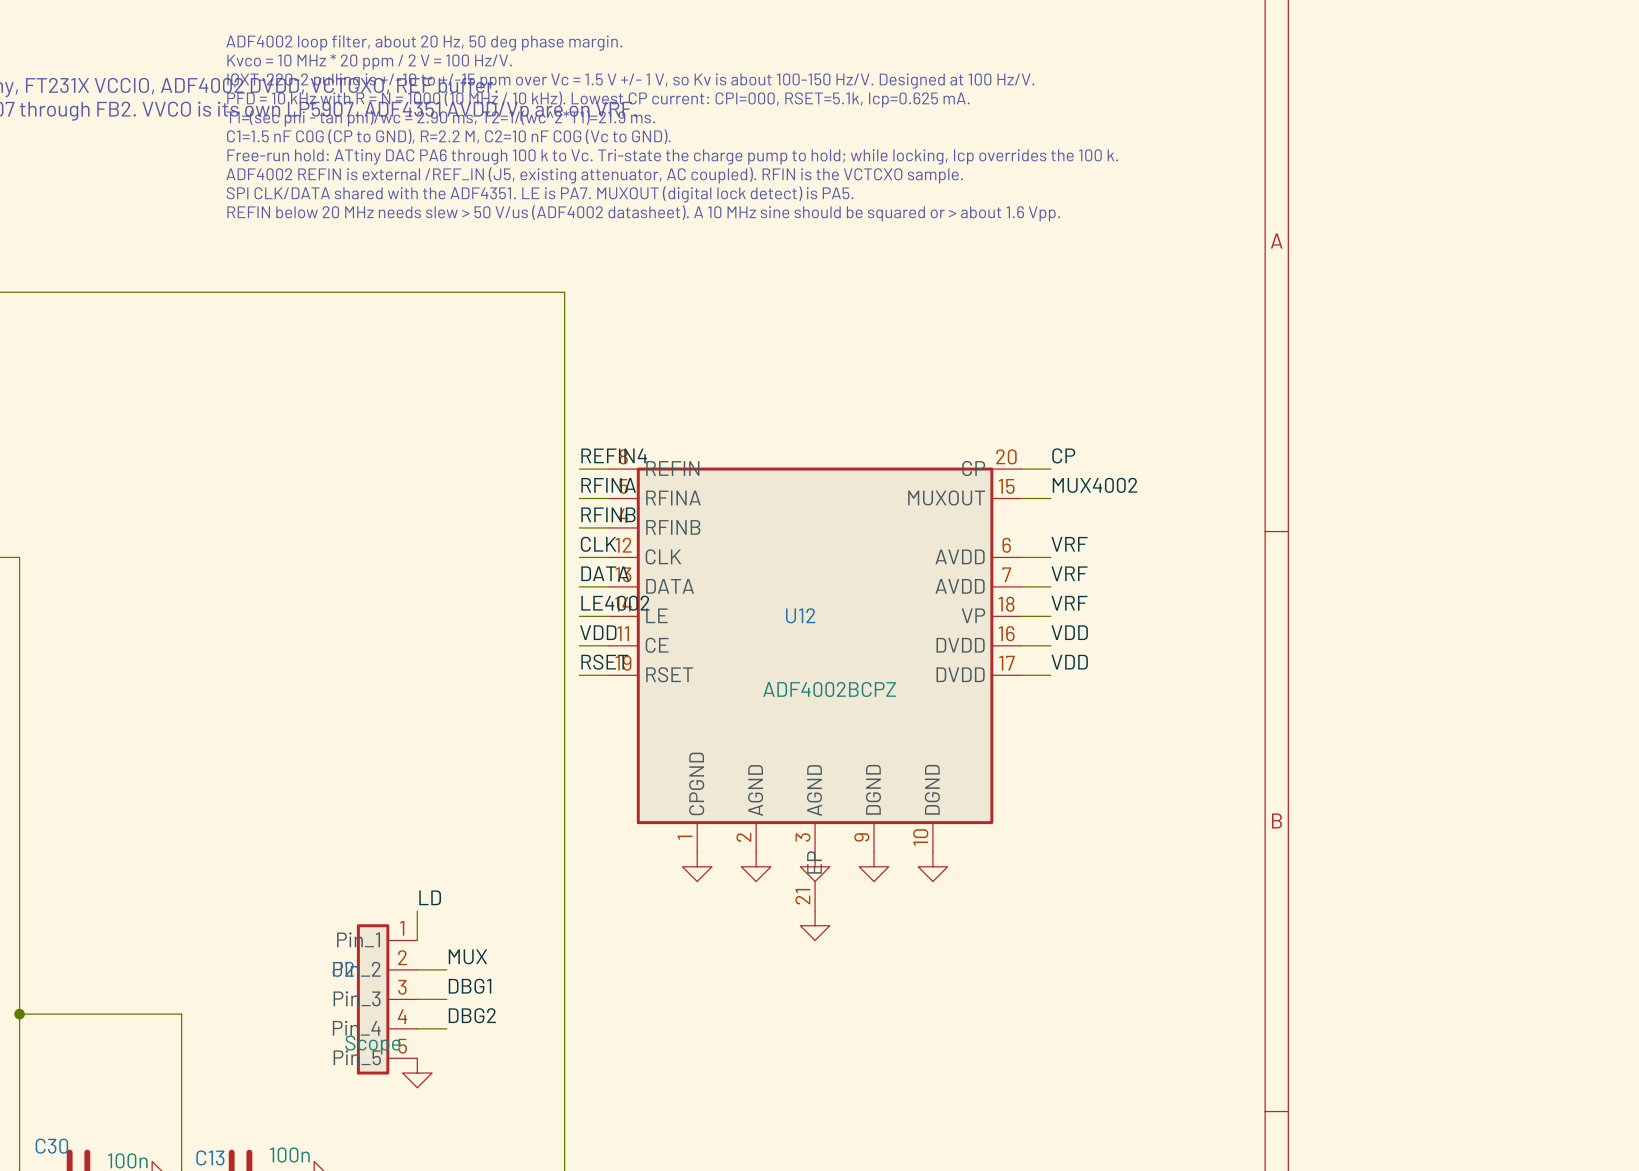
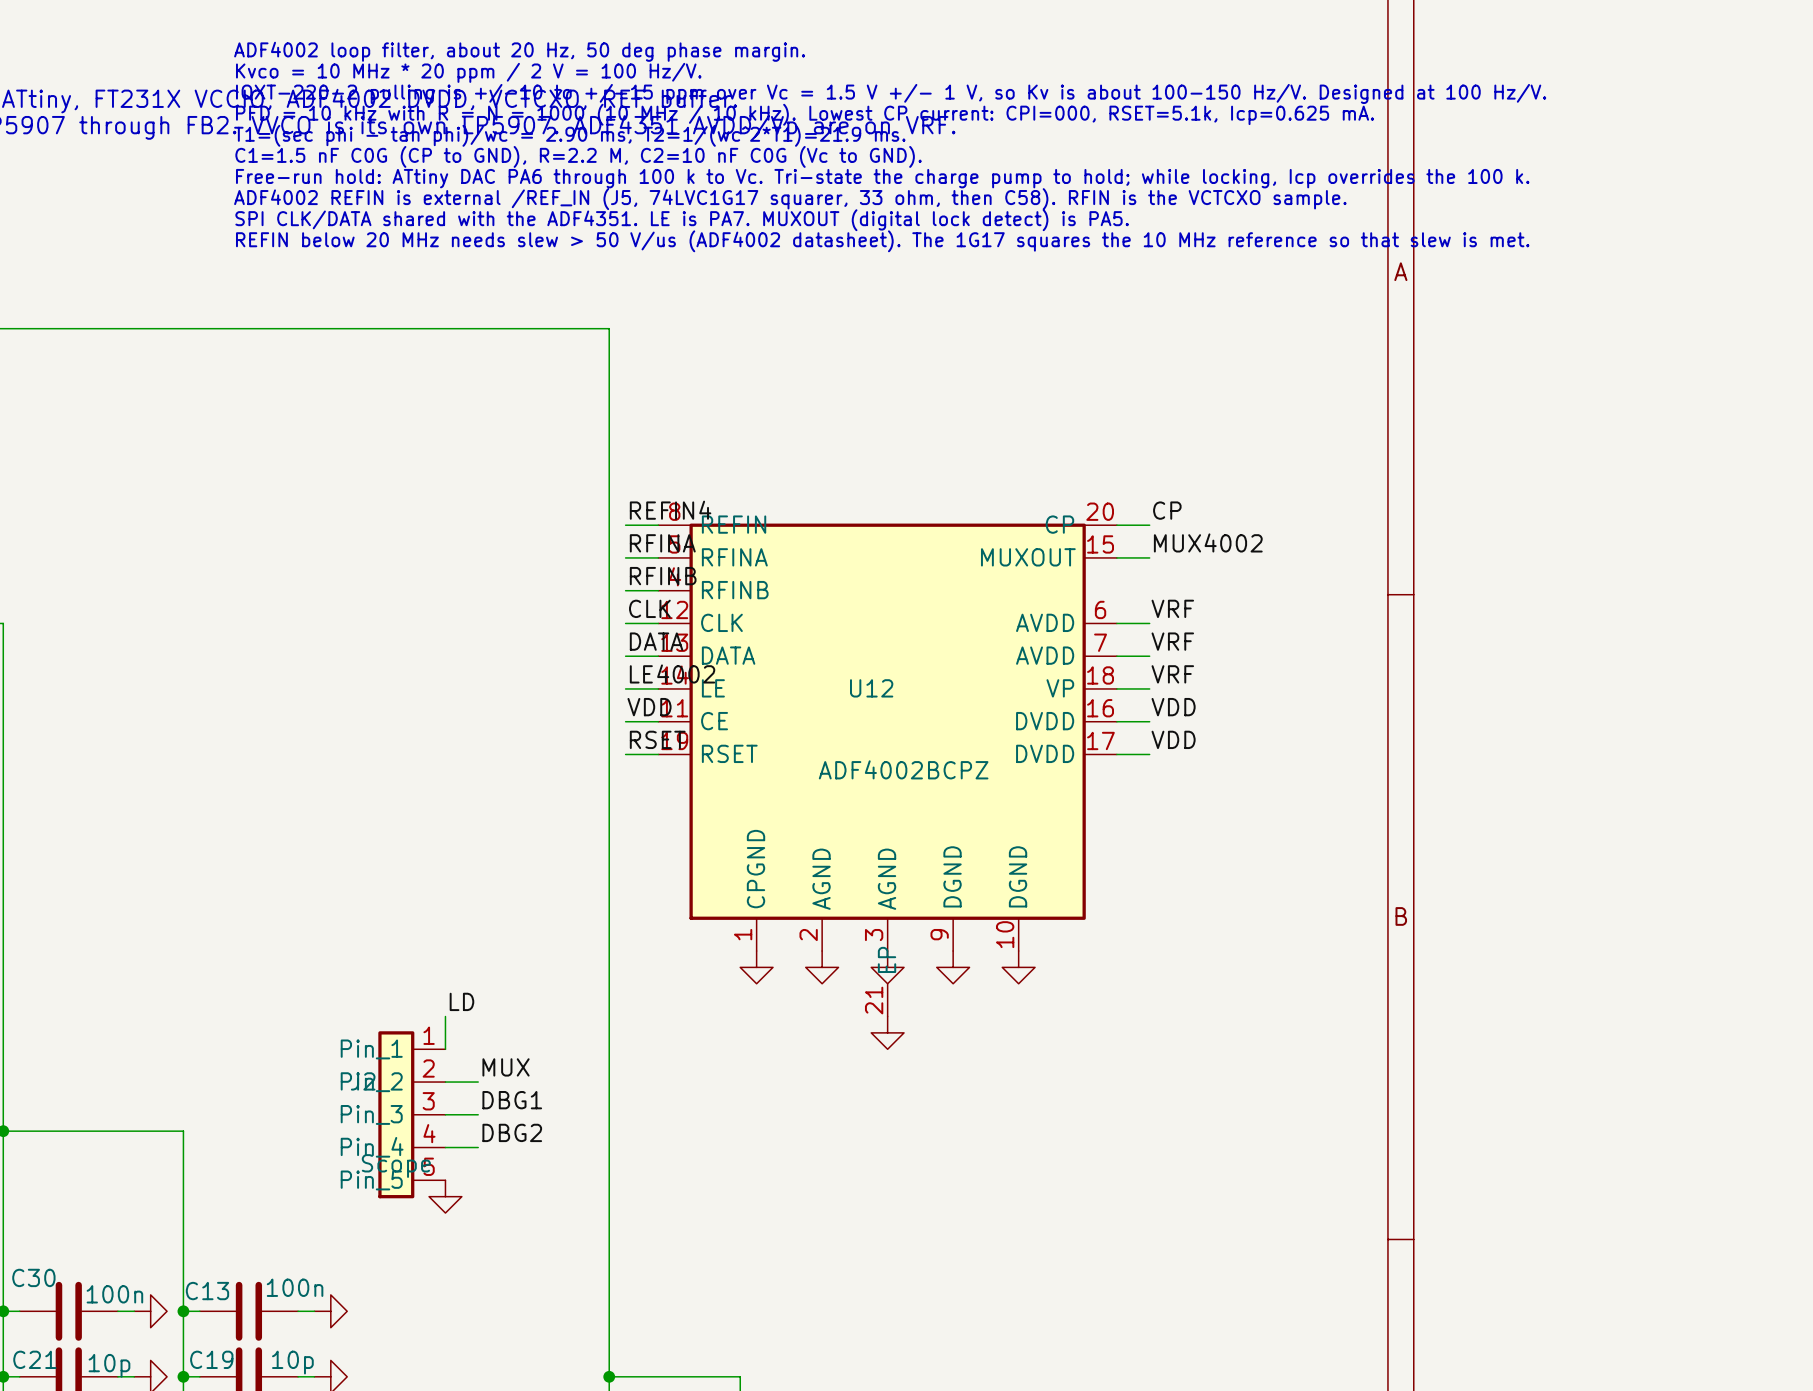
text: ADF4002 REFIN is external /REF_IN (J5, existing attenuator, AC coupled). RFIN is the VCTCXO sample. (594, 175) -> ADF4002 REFIN is external /REF_IN (J5, 74LVC1G17 squarer, 33 ohm, then C58). RFIN is the VCTCXO sample. (790, 199)
text: REFIN below 20 MHz needs slew > 50 V/us (ADF4002 datasheet). A 10 MHz sine should be squared or > about 1.6 Vpp. (643, 213) -> REFIN below 20 MHz needs slew > 50 V/us (ADF4002 datasheet). The 1G17 squares the 10 MHz reference so that slew is met. (882, 241)

